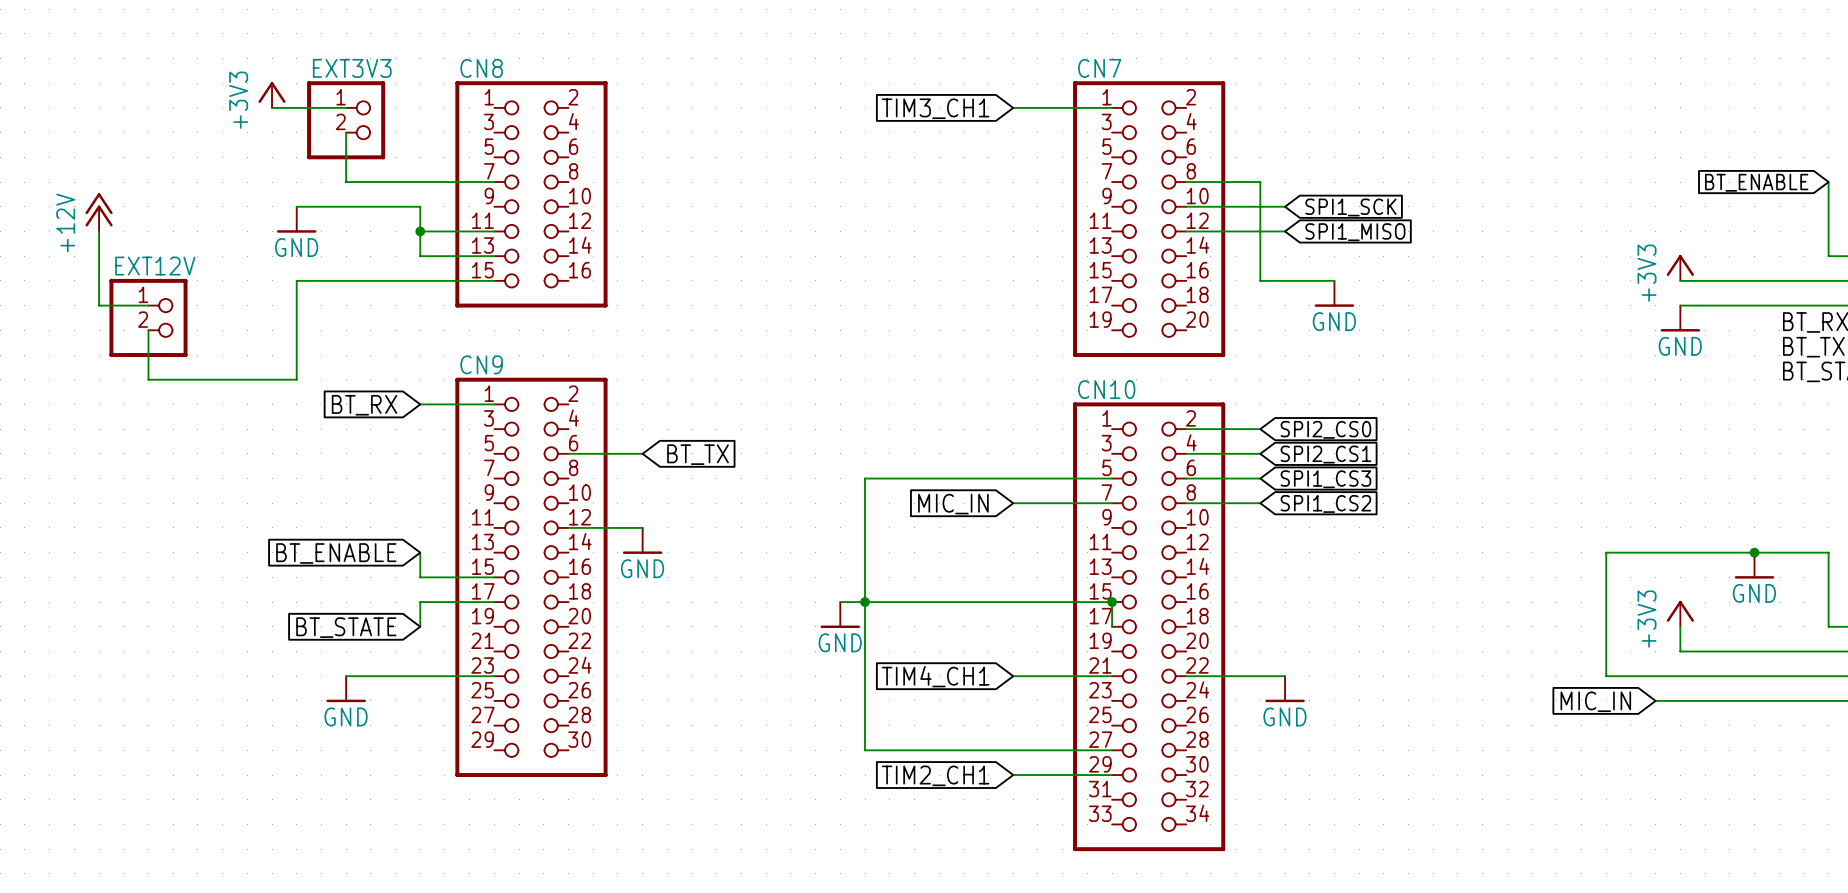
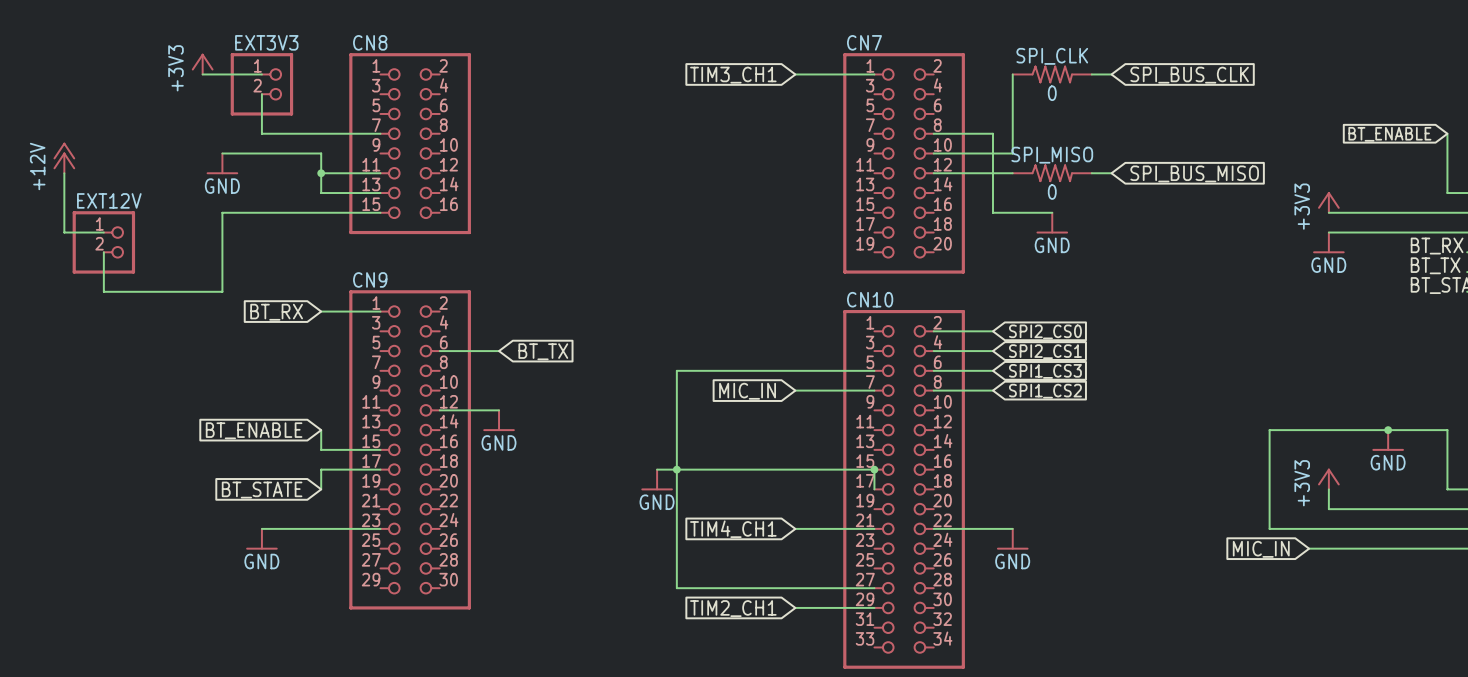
wire: none -> (1012, 74) (1012, 153)
SPI_CLK: none -> 0 (1052, 74)
wire: none -> (1091, 74) (1111, 74)
global label: none -> SPI_BUS_CLK (1189, 75)
global label: SPI1_SCK (1350, 207) -> none
SPI_MISO: none -> 0 (1052, 173)
wire: none -> (1091, 173) (1111, 173)
global label: SPI1_MISO (1355, 232) -> SPI_BUS_MISO (1194, 173)

